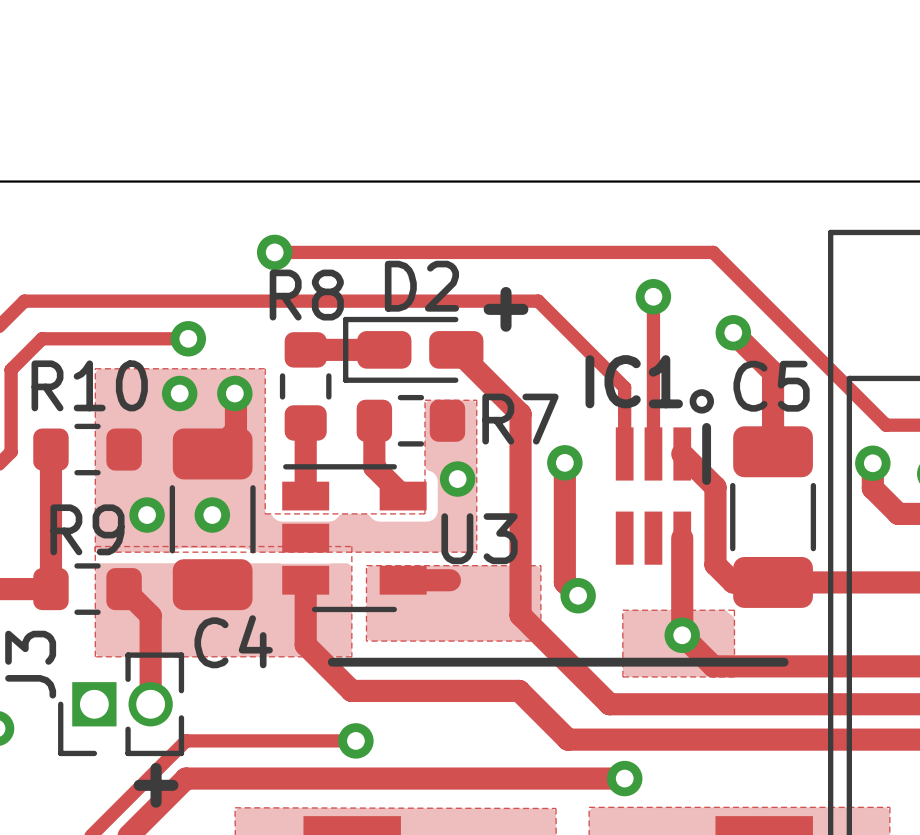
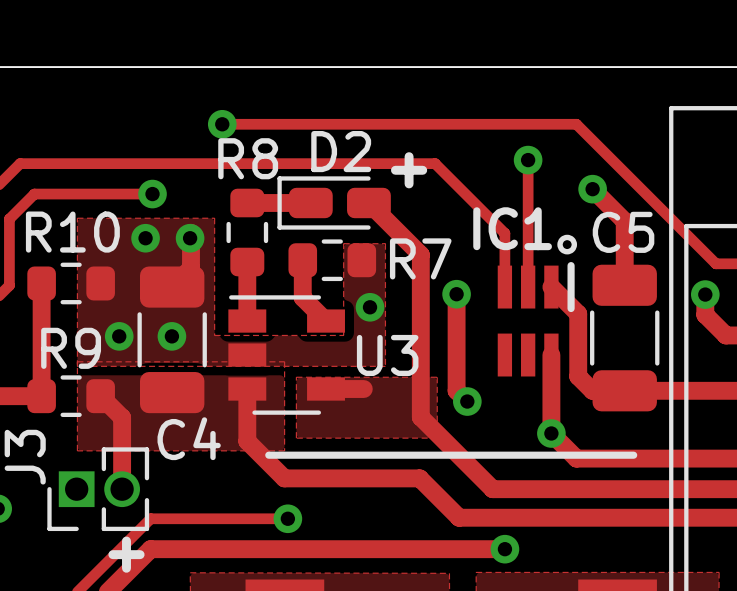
zone outline: (622, 610) (622, 676) (734, 676) (734, 610) (622, 610) -> none

